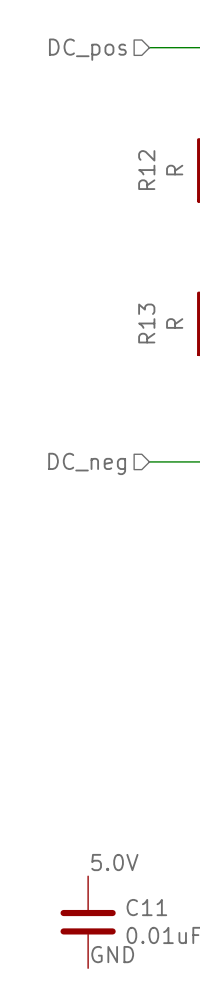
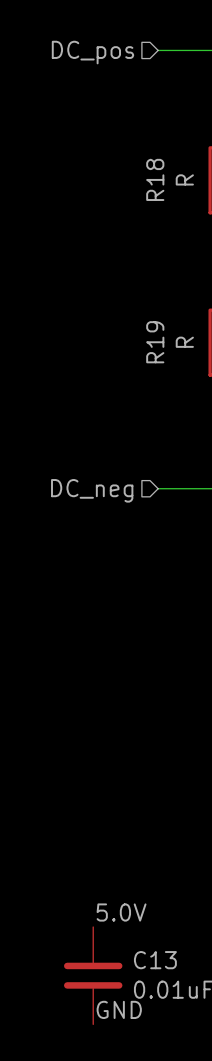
R12 name: R12 (146, 170) -> R18 (155, 179)
R13 name: R13 (146, 323) -> R19 (155, 342)
C11 name: C11 (146, 907) -> C13 (155, 960)

